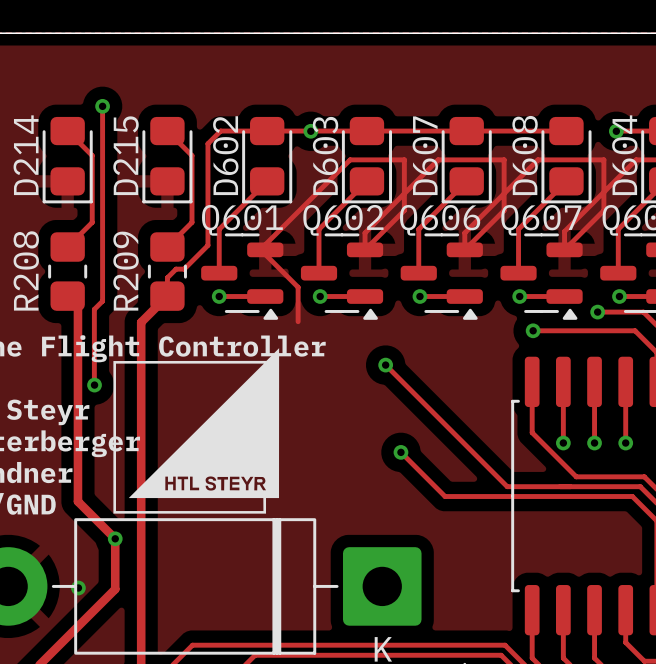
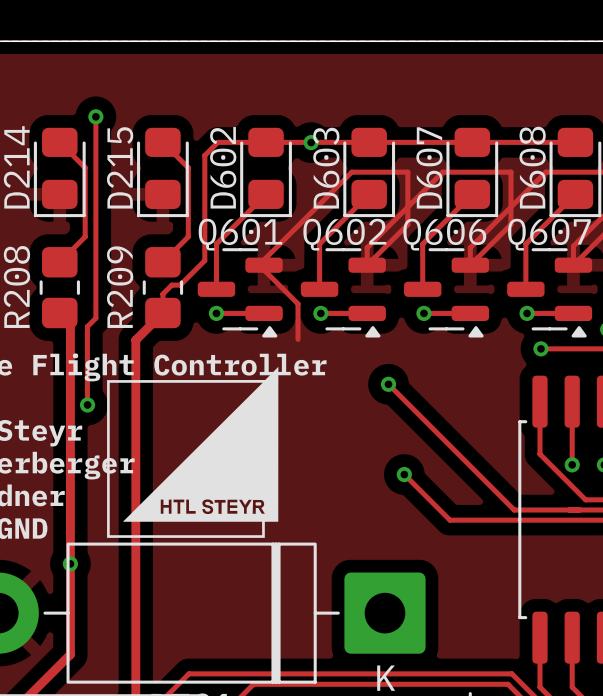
track: (77, 501) (115, 538) (115, 589) (77, 626) -> (70, 525) (70, 654)
via: none -> (70, 563)
via: (115, 538) -> none
via: (78, 588) -> none

